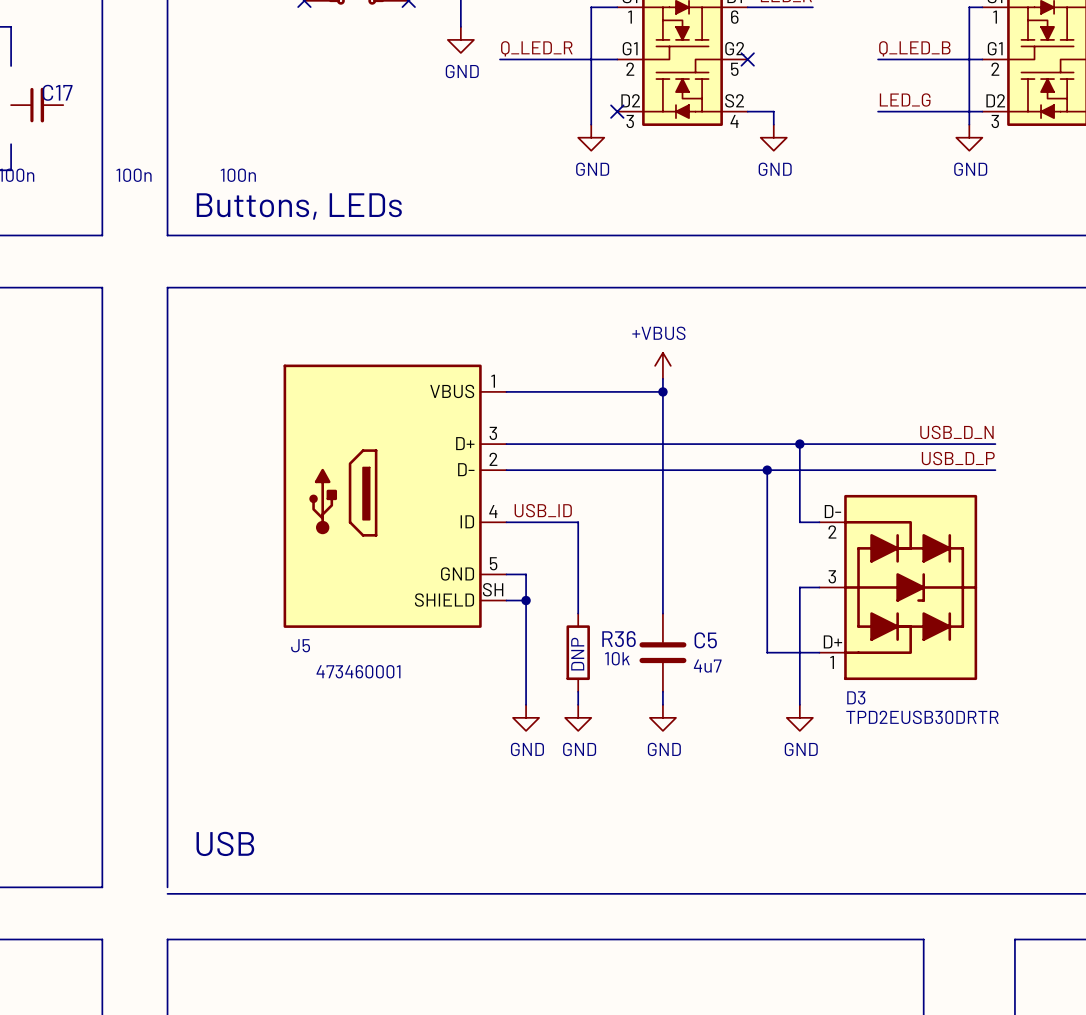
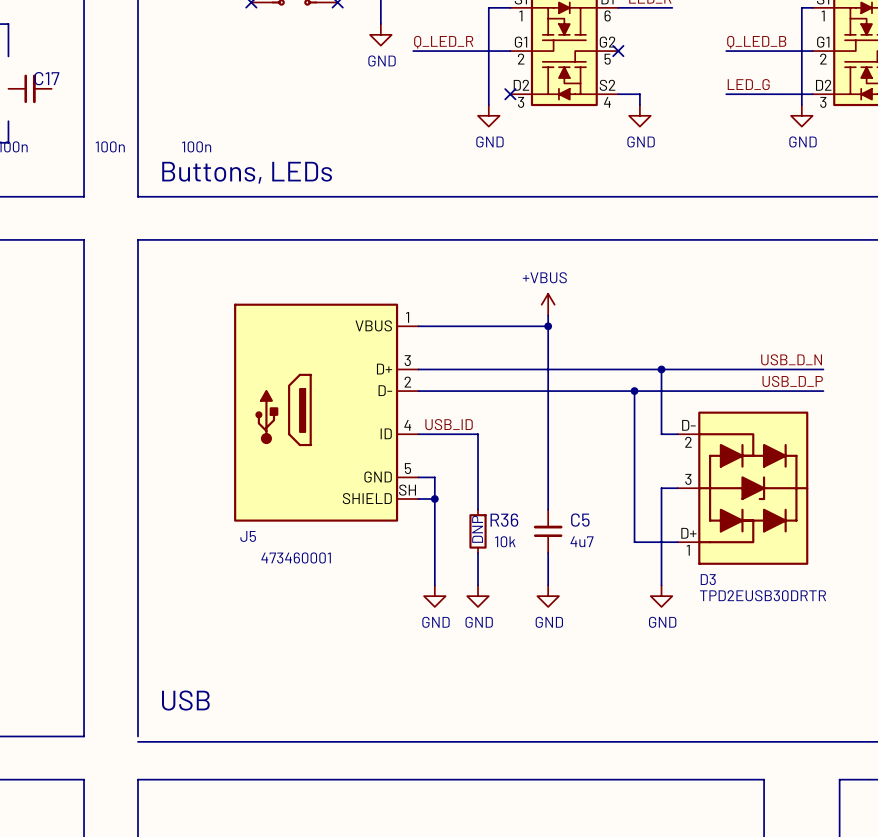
R36 symbol: [566, 613, 590, 692] -> [469, 509, 487, 553]
C5 symbol: [639, 613, 687, 692] -> [533, 509, 563, 553]

